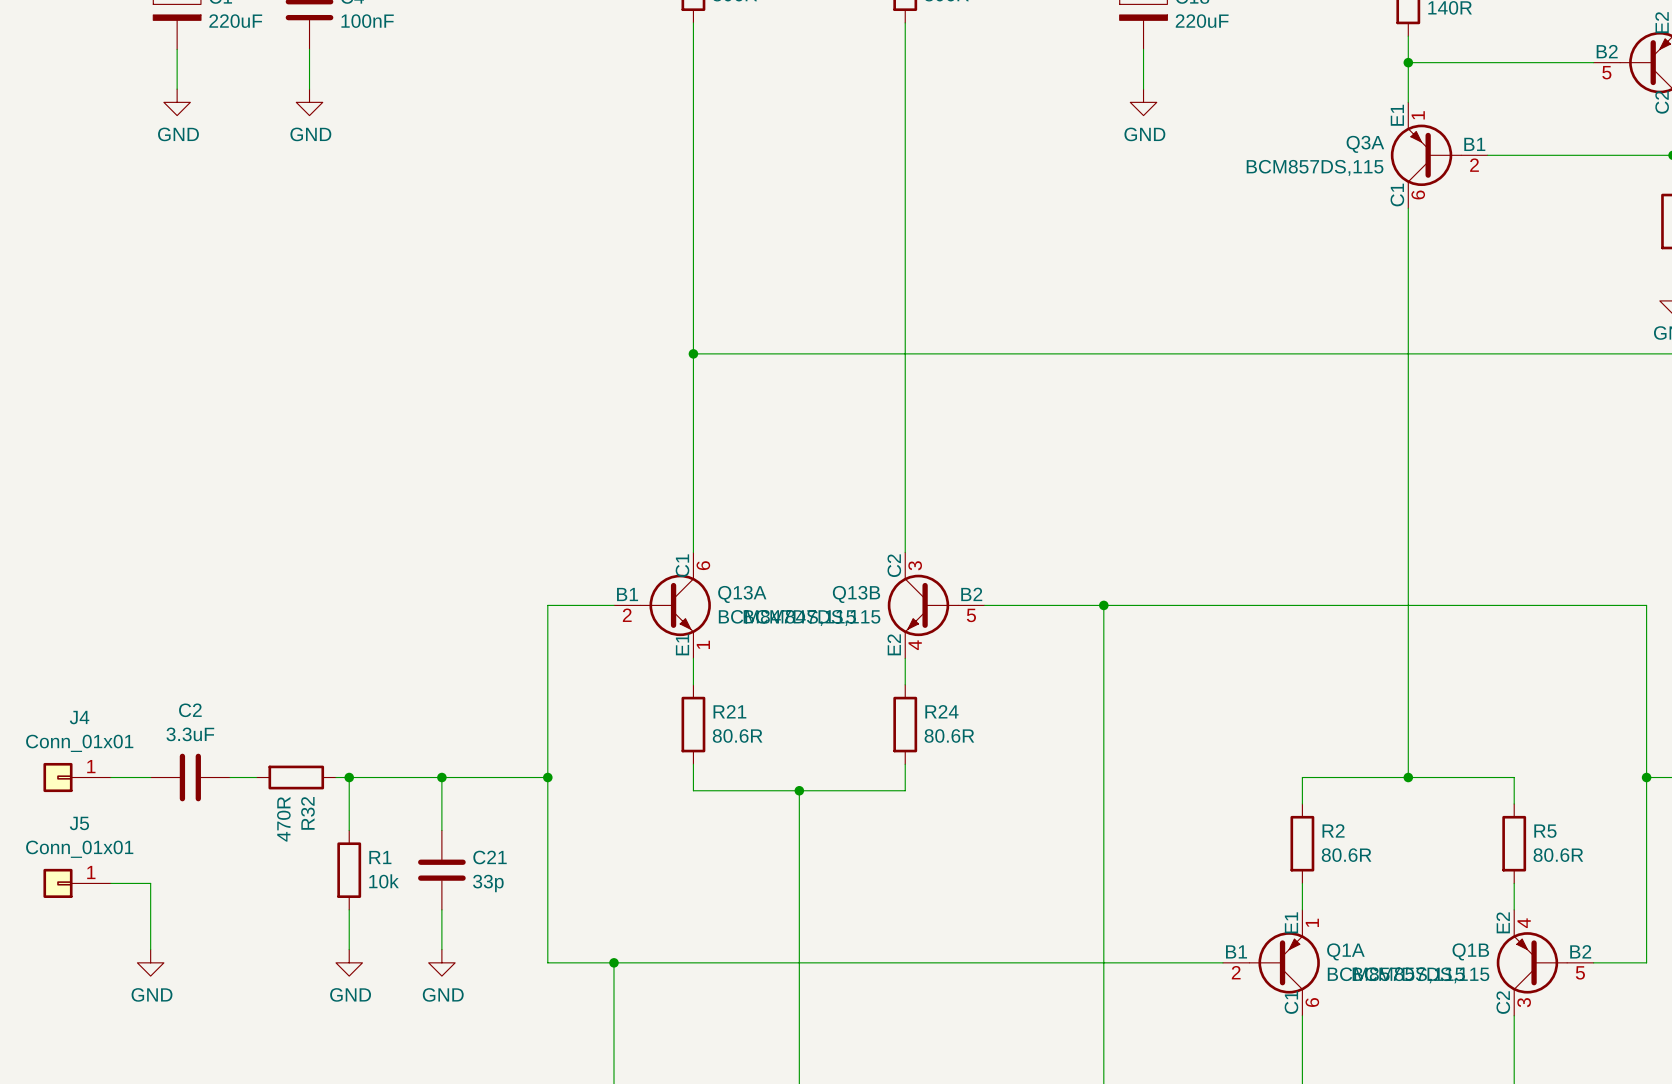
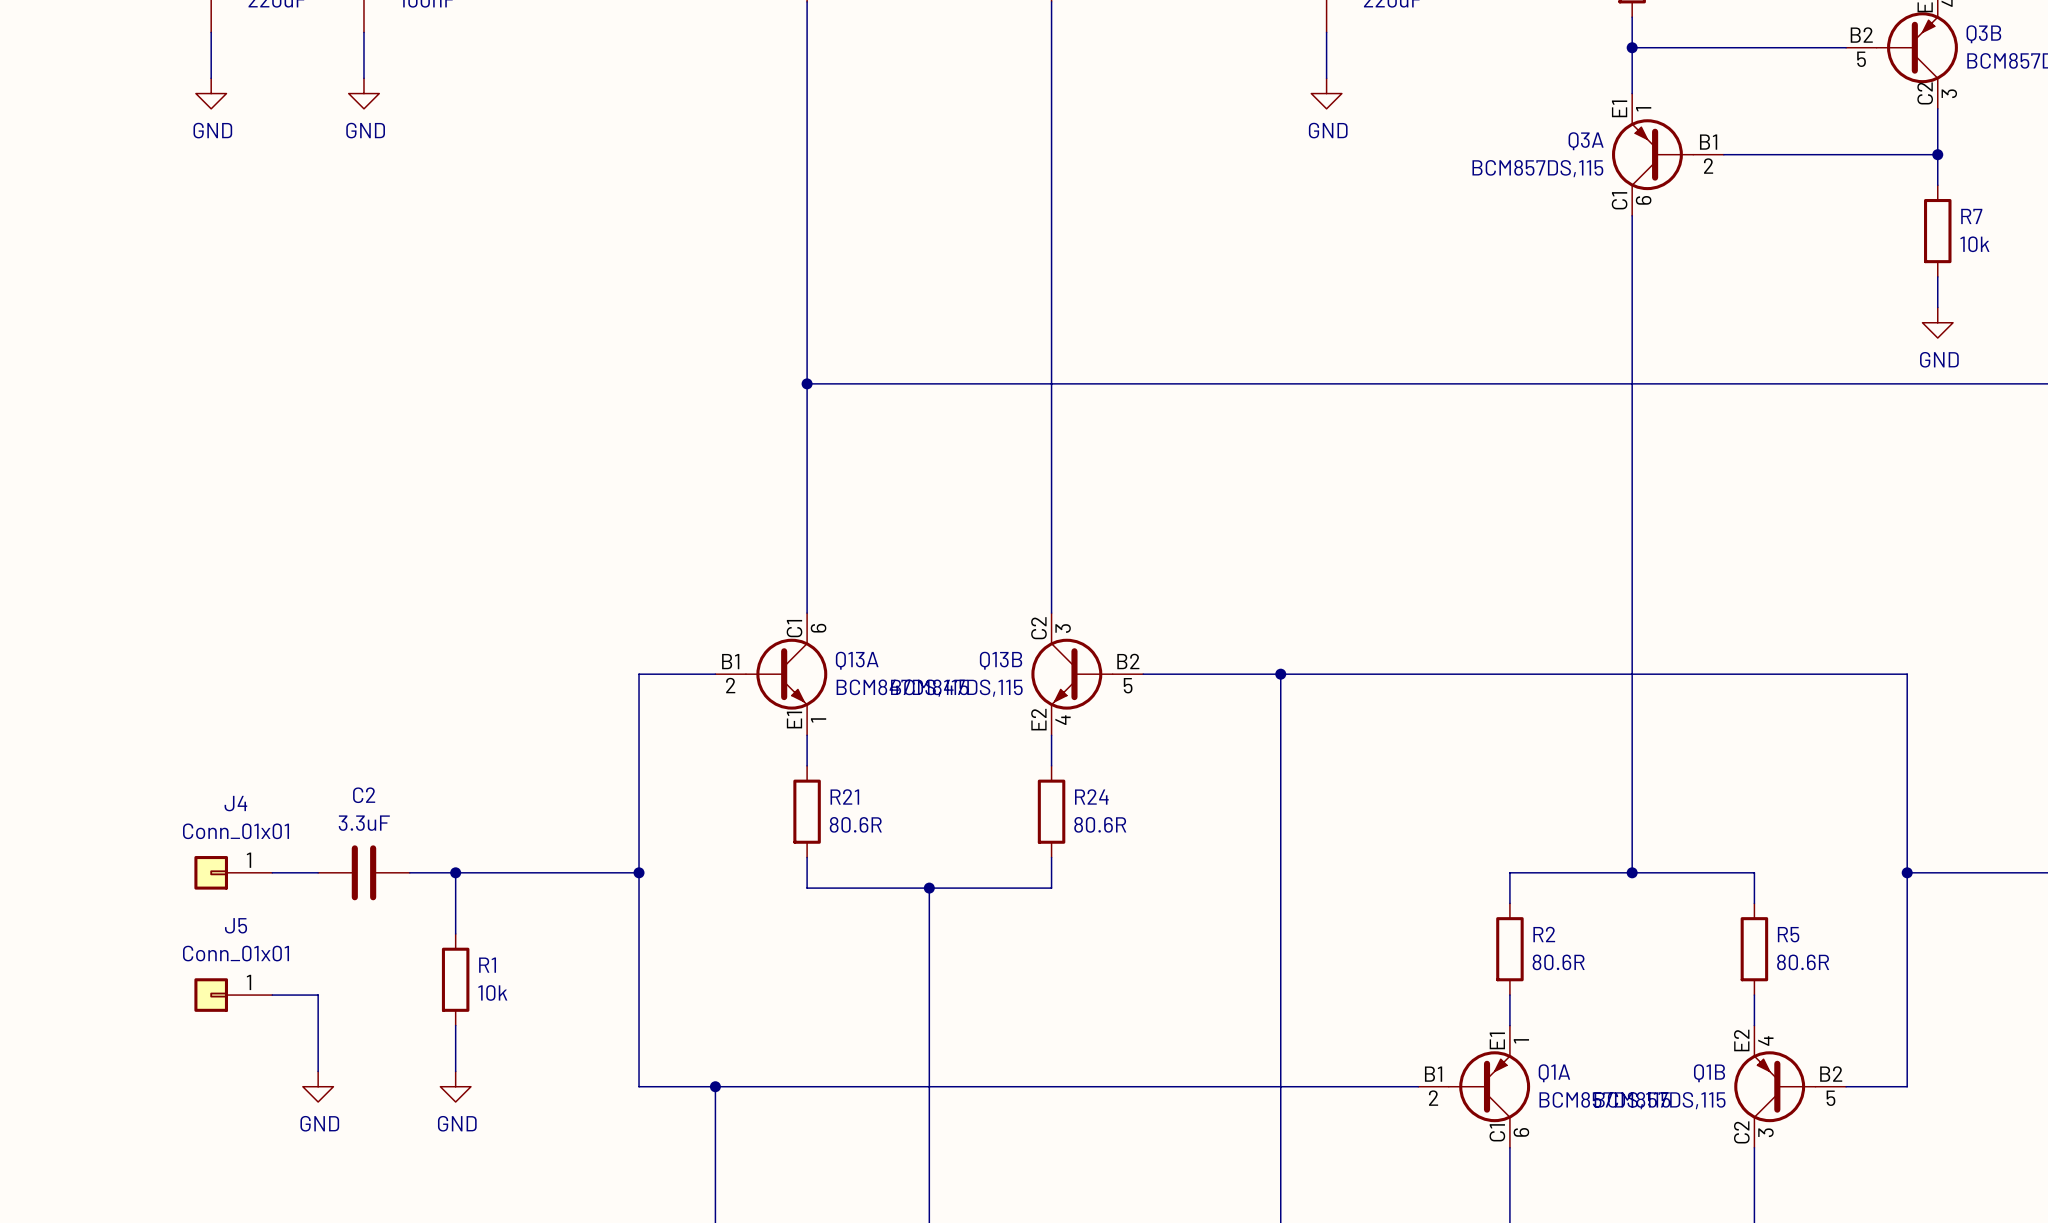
J4 position: (77, 777) -> (233, 872)
wire: (110, 777) (150, 777) -> none
C2 position: (190, 777) -> (363, 872)
R32: 470R (296, 777) -> none
wire: (335, 777) (349, 777) (349, 830) -> none
junction: (349, 777) -> none
junction: none -> (455, 872)
wire: (441, 777) (441, 830) -> (455, 872) (455, 933)
junction: (441, 777) -> none
R1 position: (349, 870) -> (455, 979)
C21: 33p (441, 870) -> none
J5 position: (77, 883) -> (233, 995)
wire: (110, 883) (150, 883) (150, 949) -> (272, 995) (318, 995) (318, 1071)
wire: (349, 909) (349, 949) -> none
wire: (441, 909) (441, 949) -> (455, 1025) (455, 1071)
power symbol: GND (150, 962) -> none
power symbol: none -> GND (318, 1086)
power symbol: GND (349, 962) -> none
power symbol: none -> GND (455, 1086)
power symbol: GND (441, 962) -> none

